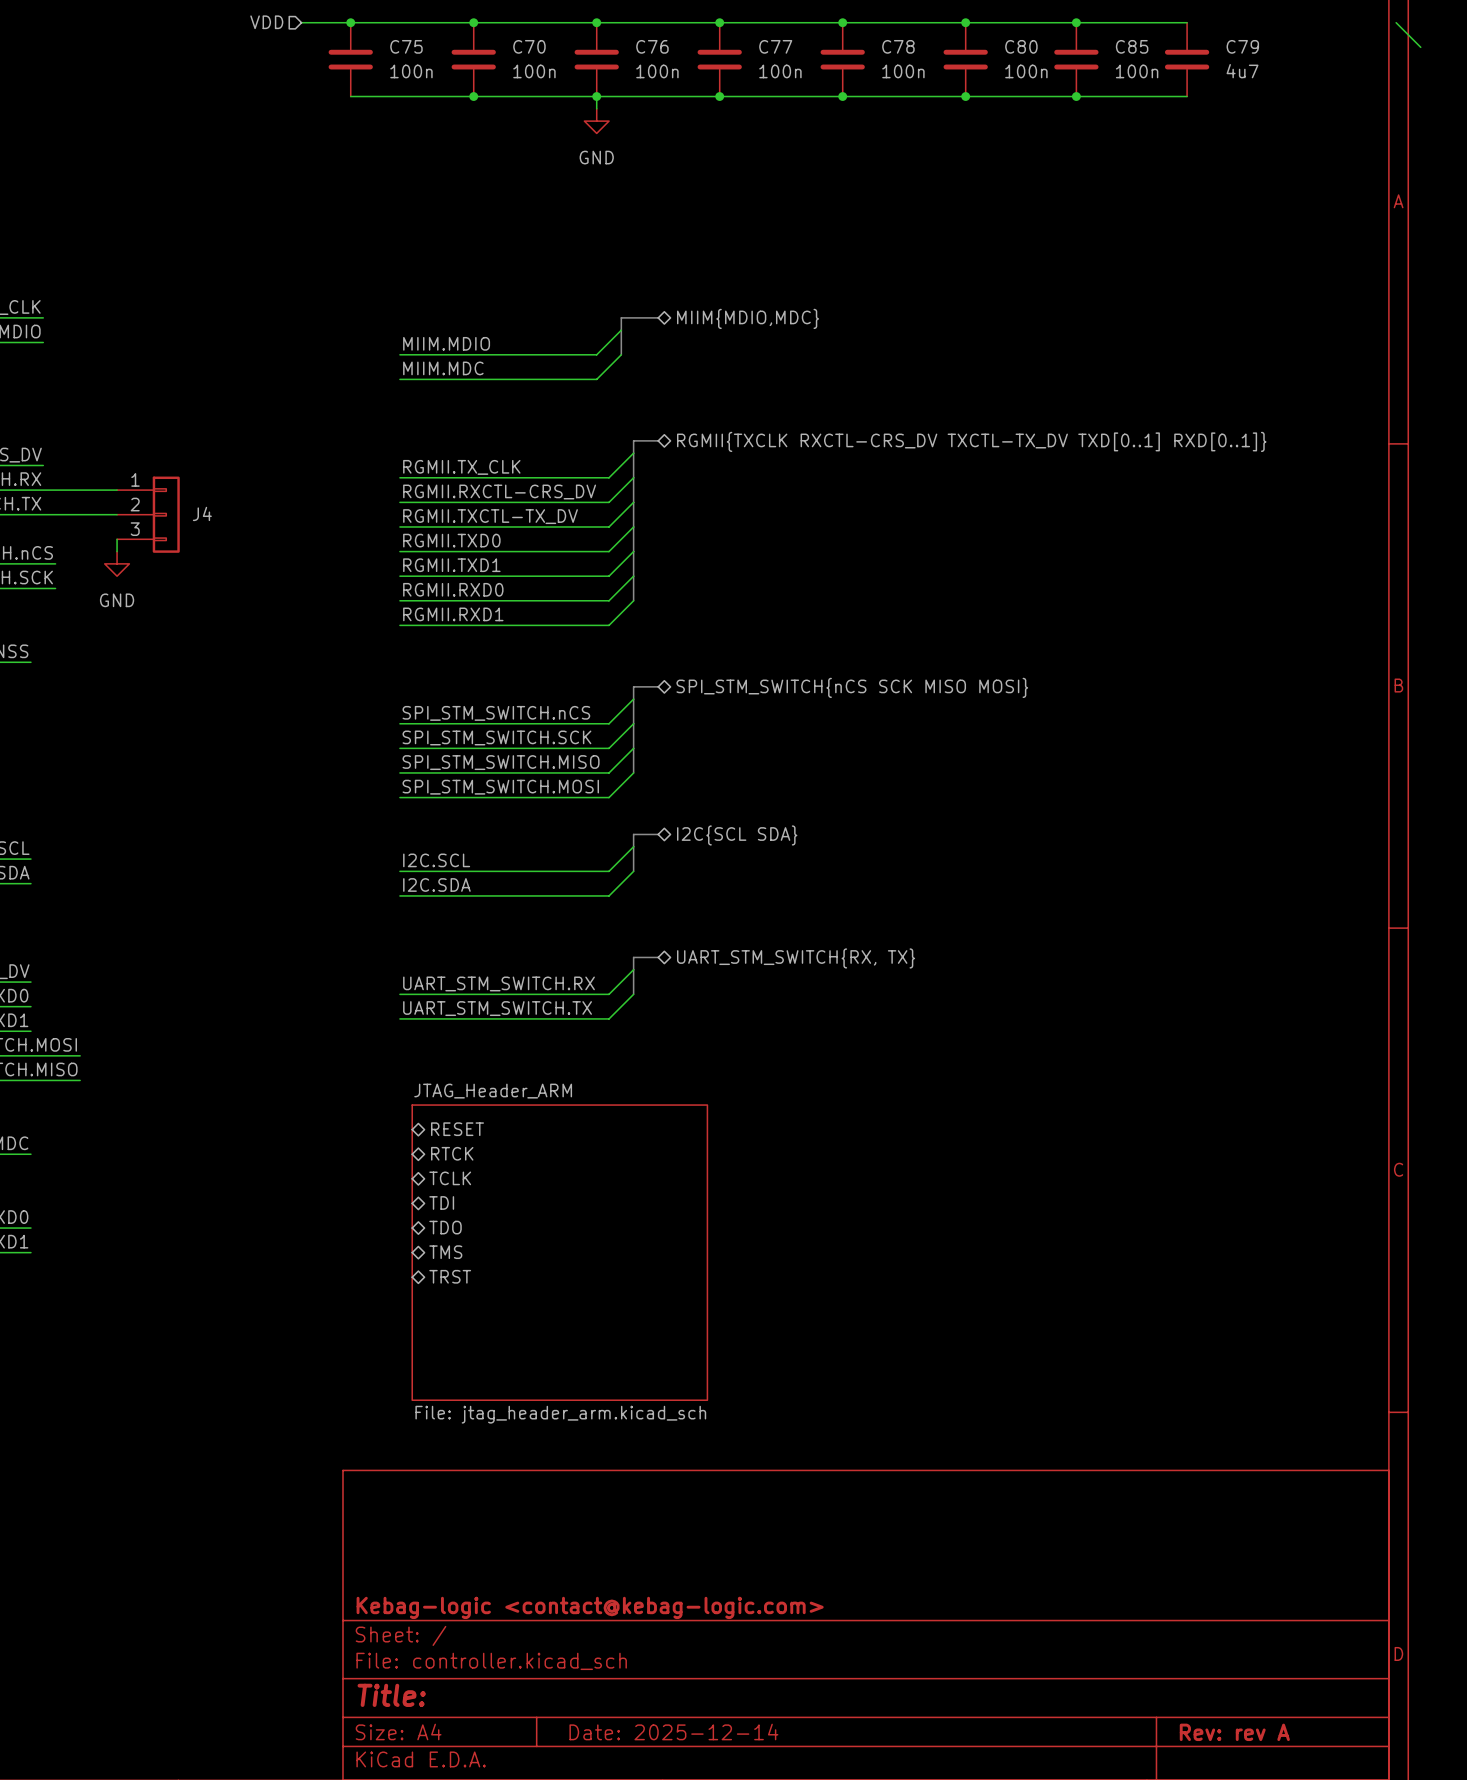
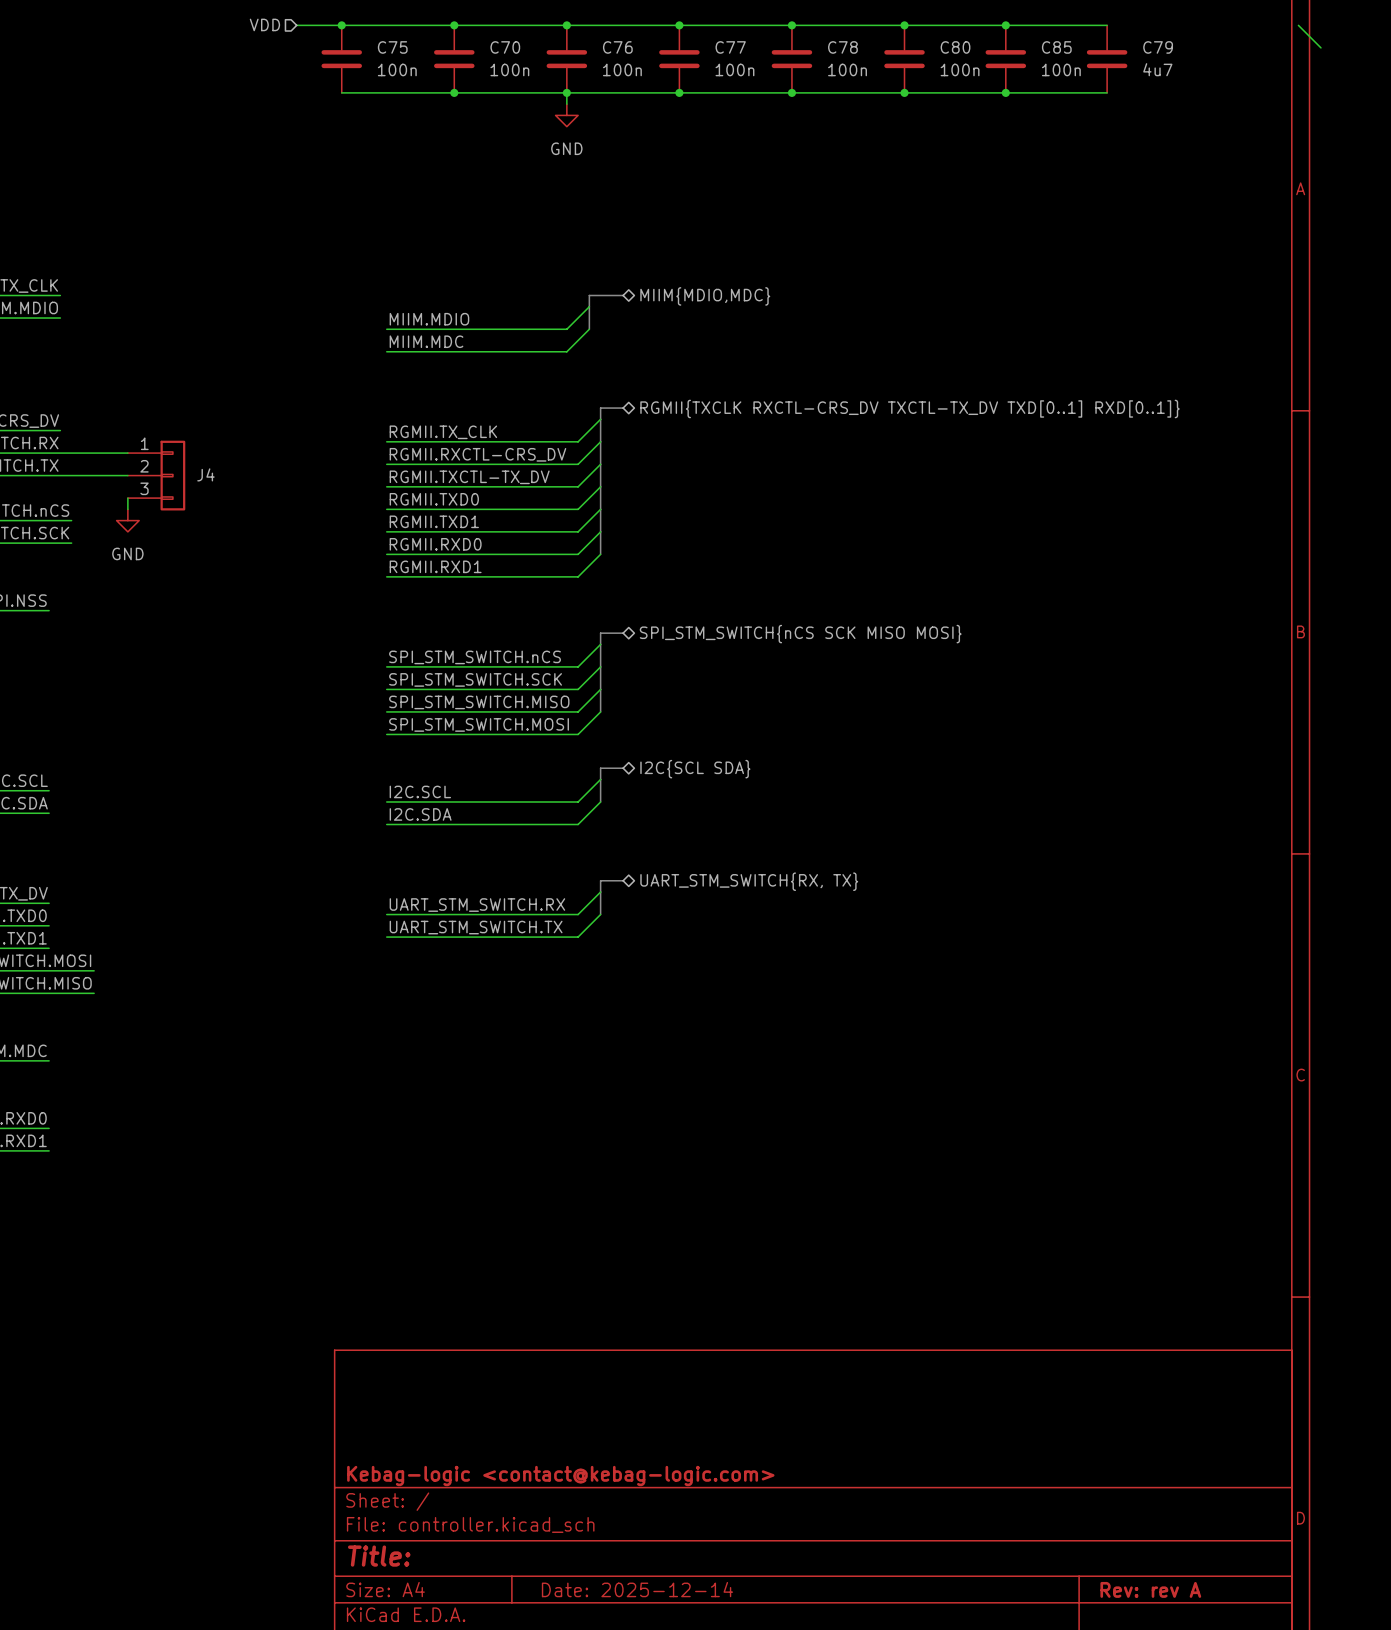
sheet pin: RESET (457, 1129) -> none
sheet pin: RTCK (452, 1153) -> none
sheet pin: TCLK (450, 1178) -> none
sheet pin: TDI (441, 1202) -> none
sheet pin: TDO (445, 1227) -> none
sheet pin: TMS (445, 1252) -> none
sheet JTAG_Header_ARM: File: jtag_header_arm.kicad_sch (559, 1252) -> none
sheet pin: TRST (450, 1276) -> none

